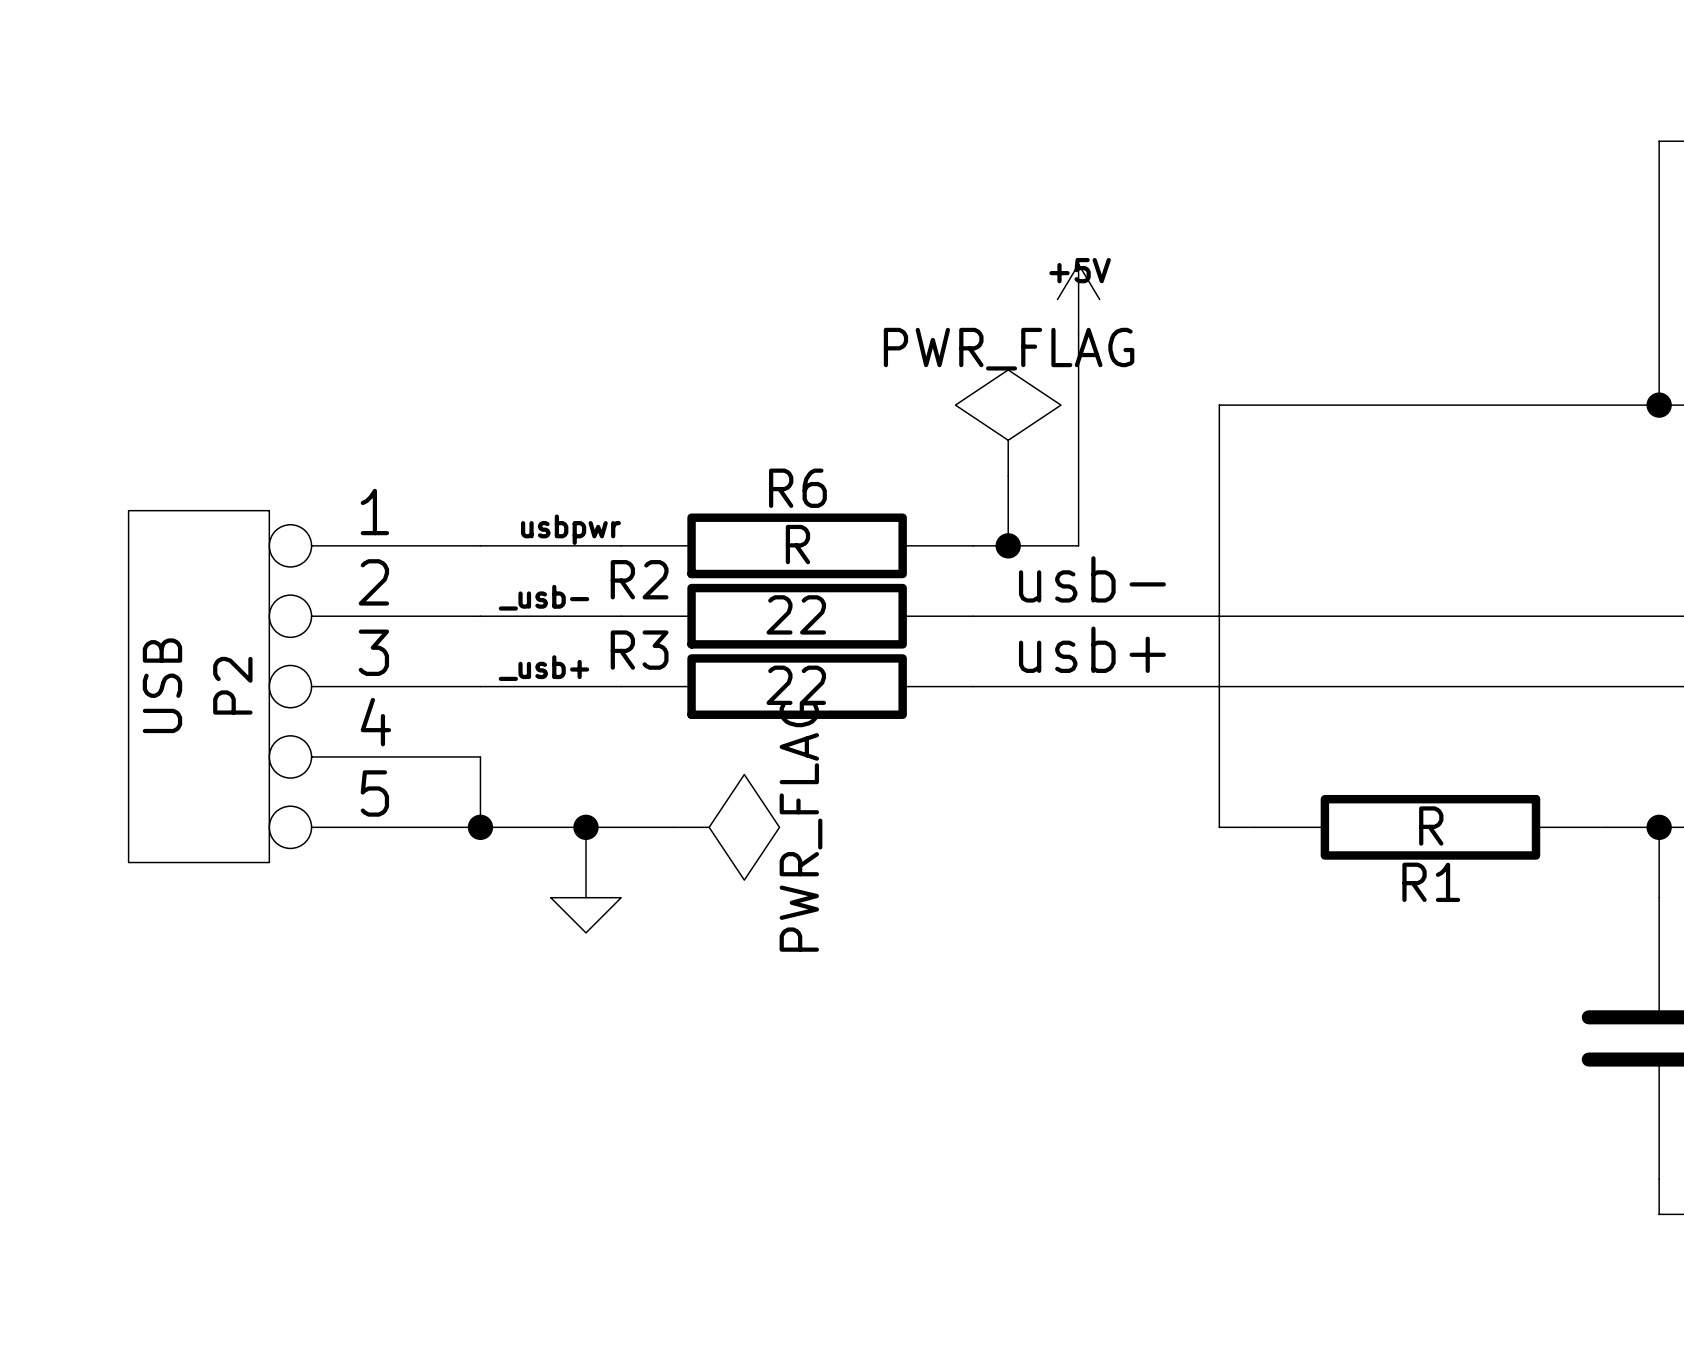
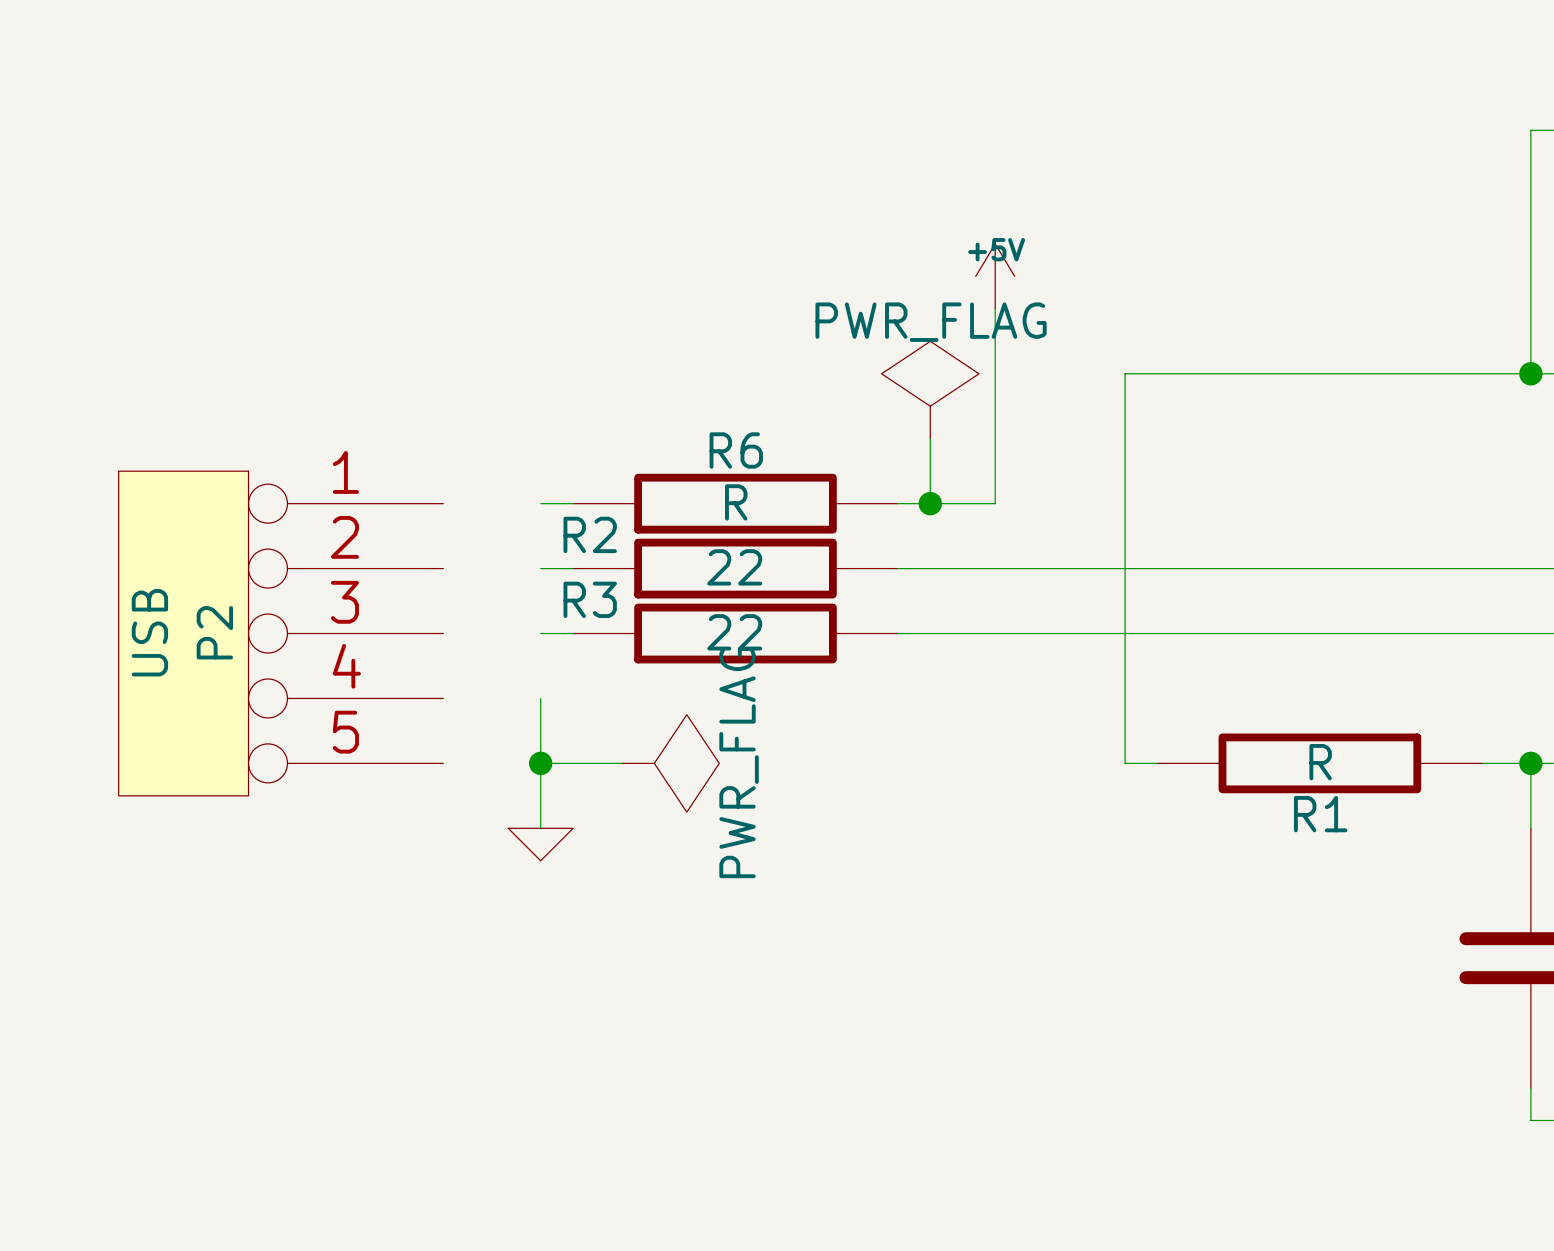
label: usbpwr (570, 529) -> none
wire: (480, 545) (586, 545) -> none
label: usb- (1092, 579) -> none
label: _usb- (543, 597) -> none
wire: (480, 616) (586, 616) -> none
label: usb+ (1092, 649) -> none
label: _usb+ (543, 668) -> none
wire: (480, 686) (586, 686) -> none
wire: (480, 756) (480, 827) (586, 827) -> (540, 698) (540, 763)
junction: (480, 827) -> none

